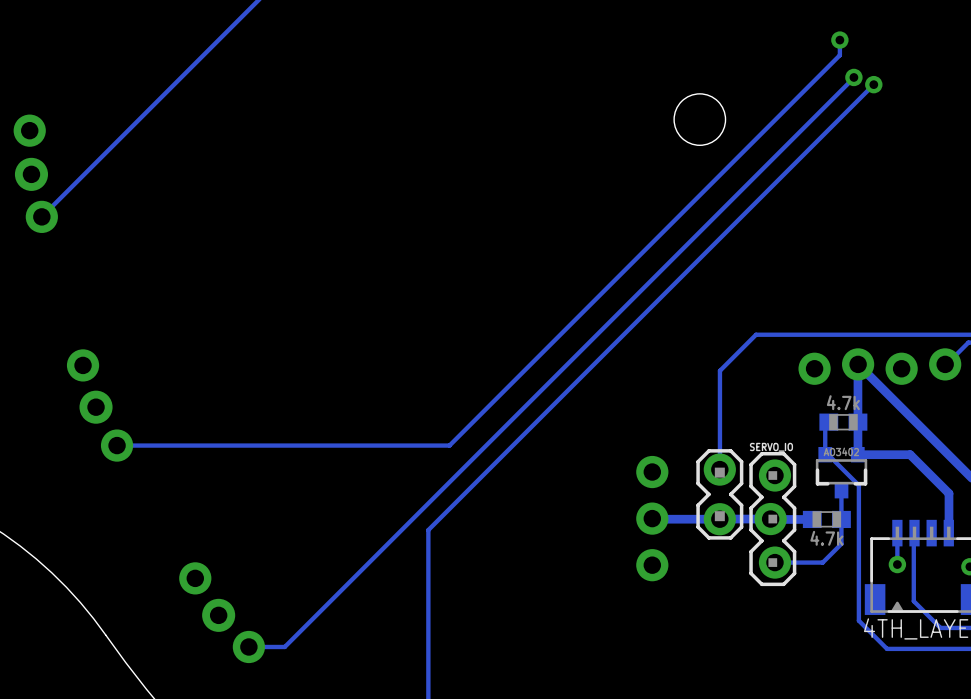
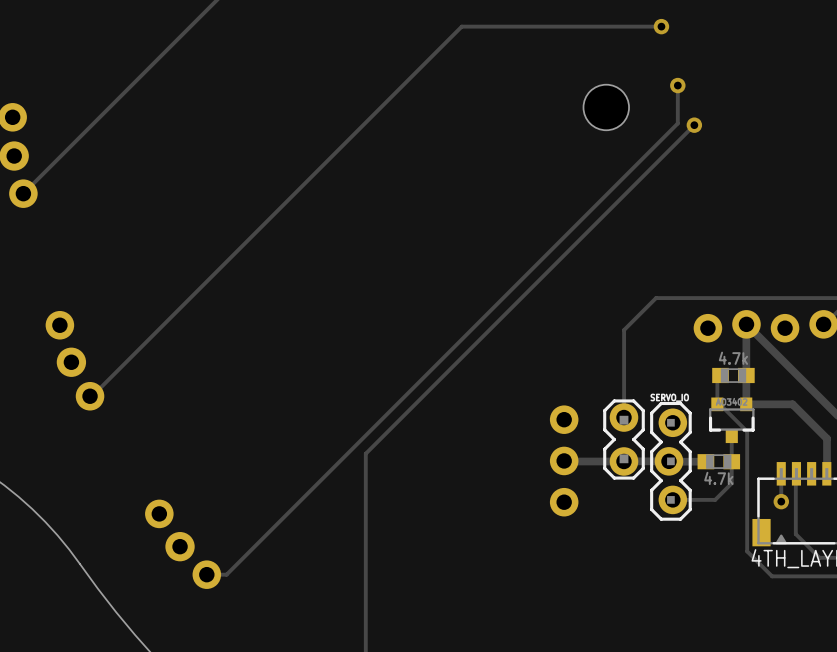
via: none -> (661, 26)
track: (839, 40) (839, 55) (449, 445) (119, 445) -> (661, 26) (461, 26) (92, 396)
via: (839, 40) -> none
track: (853, 77) (284, 646) (271, 646) -> (677, 85) (677, 123) (226, 574)
via: (853, 77) -> none
track: (873, 84) (428, 530) -> (694, 125) (365, 453) (365, 471)
via: (873, 84) -> none
via: none -> (677, 85)
via: none -> (694, 125)

